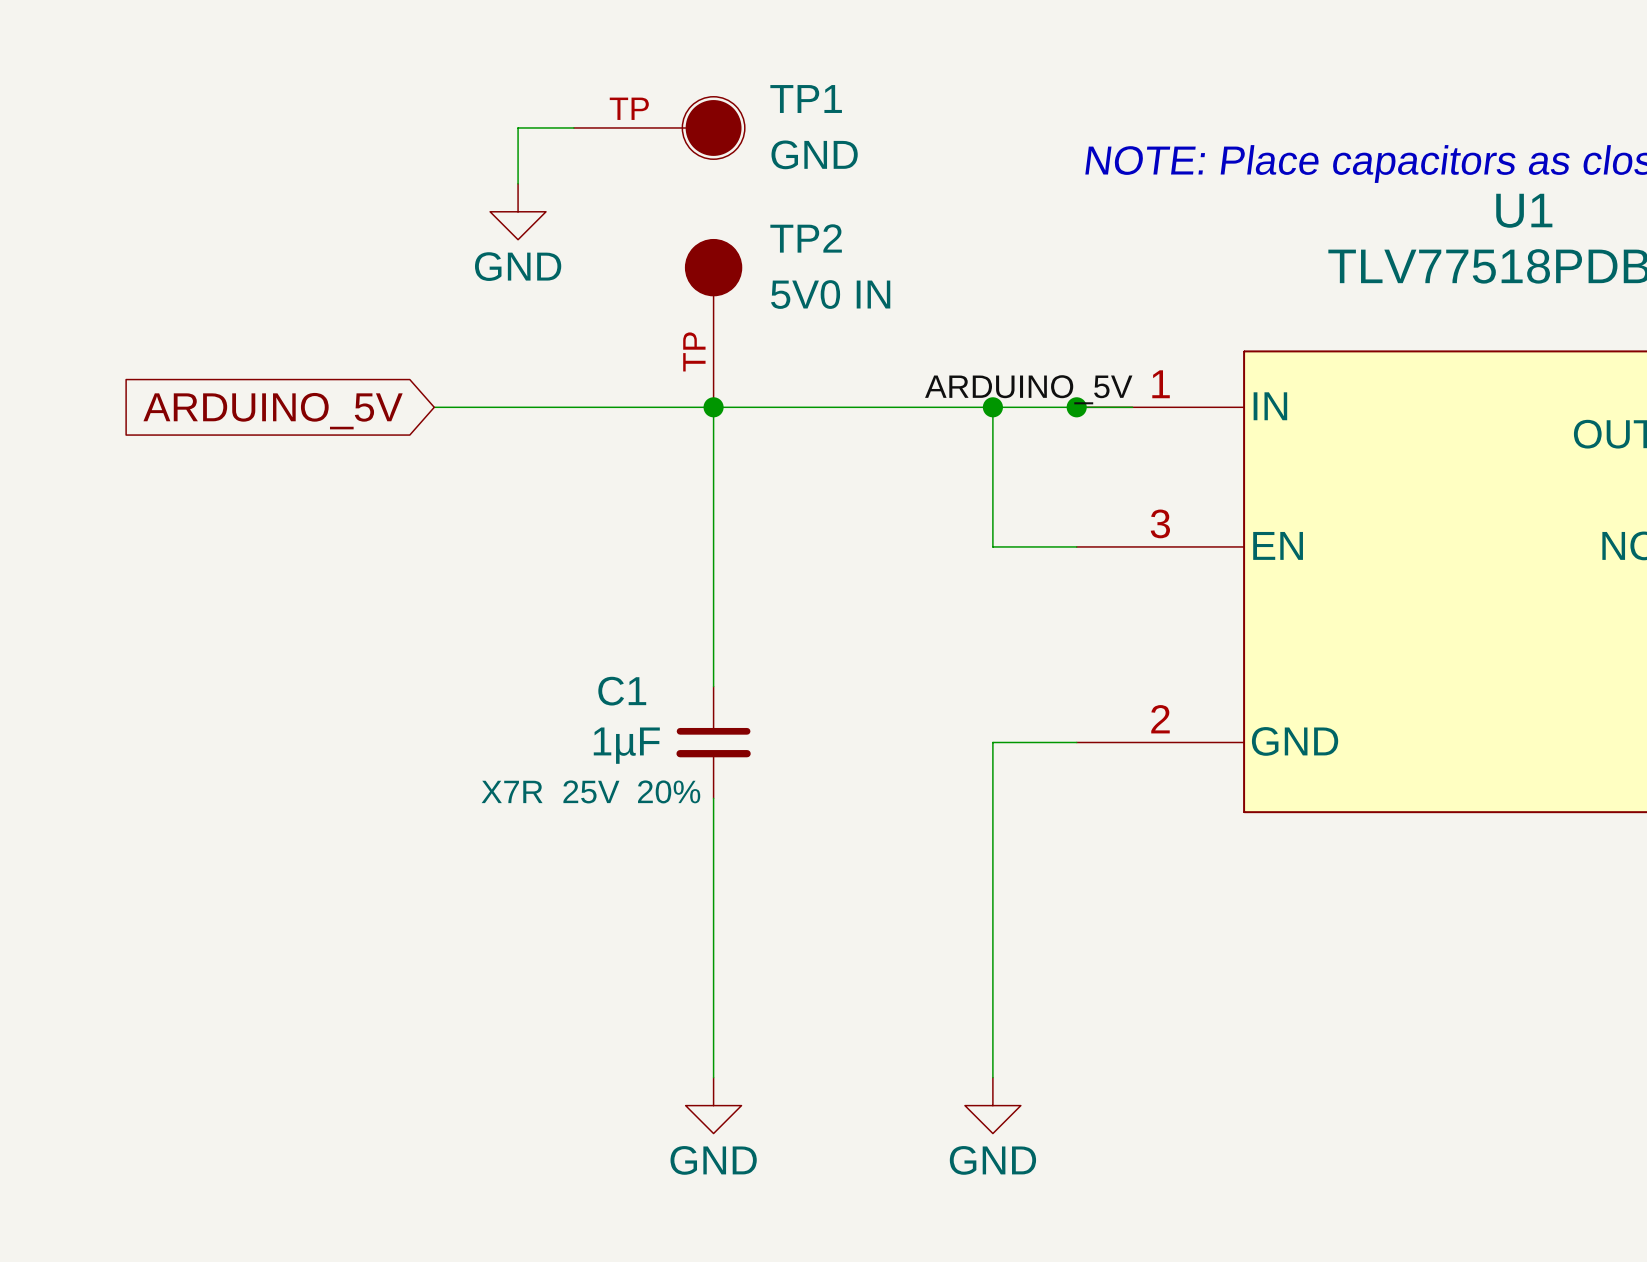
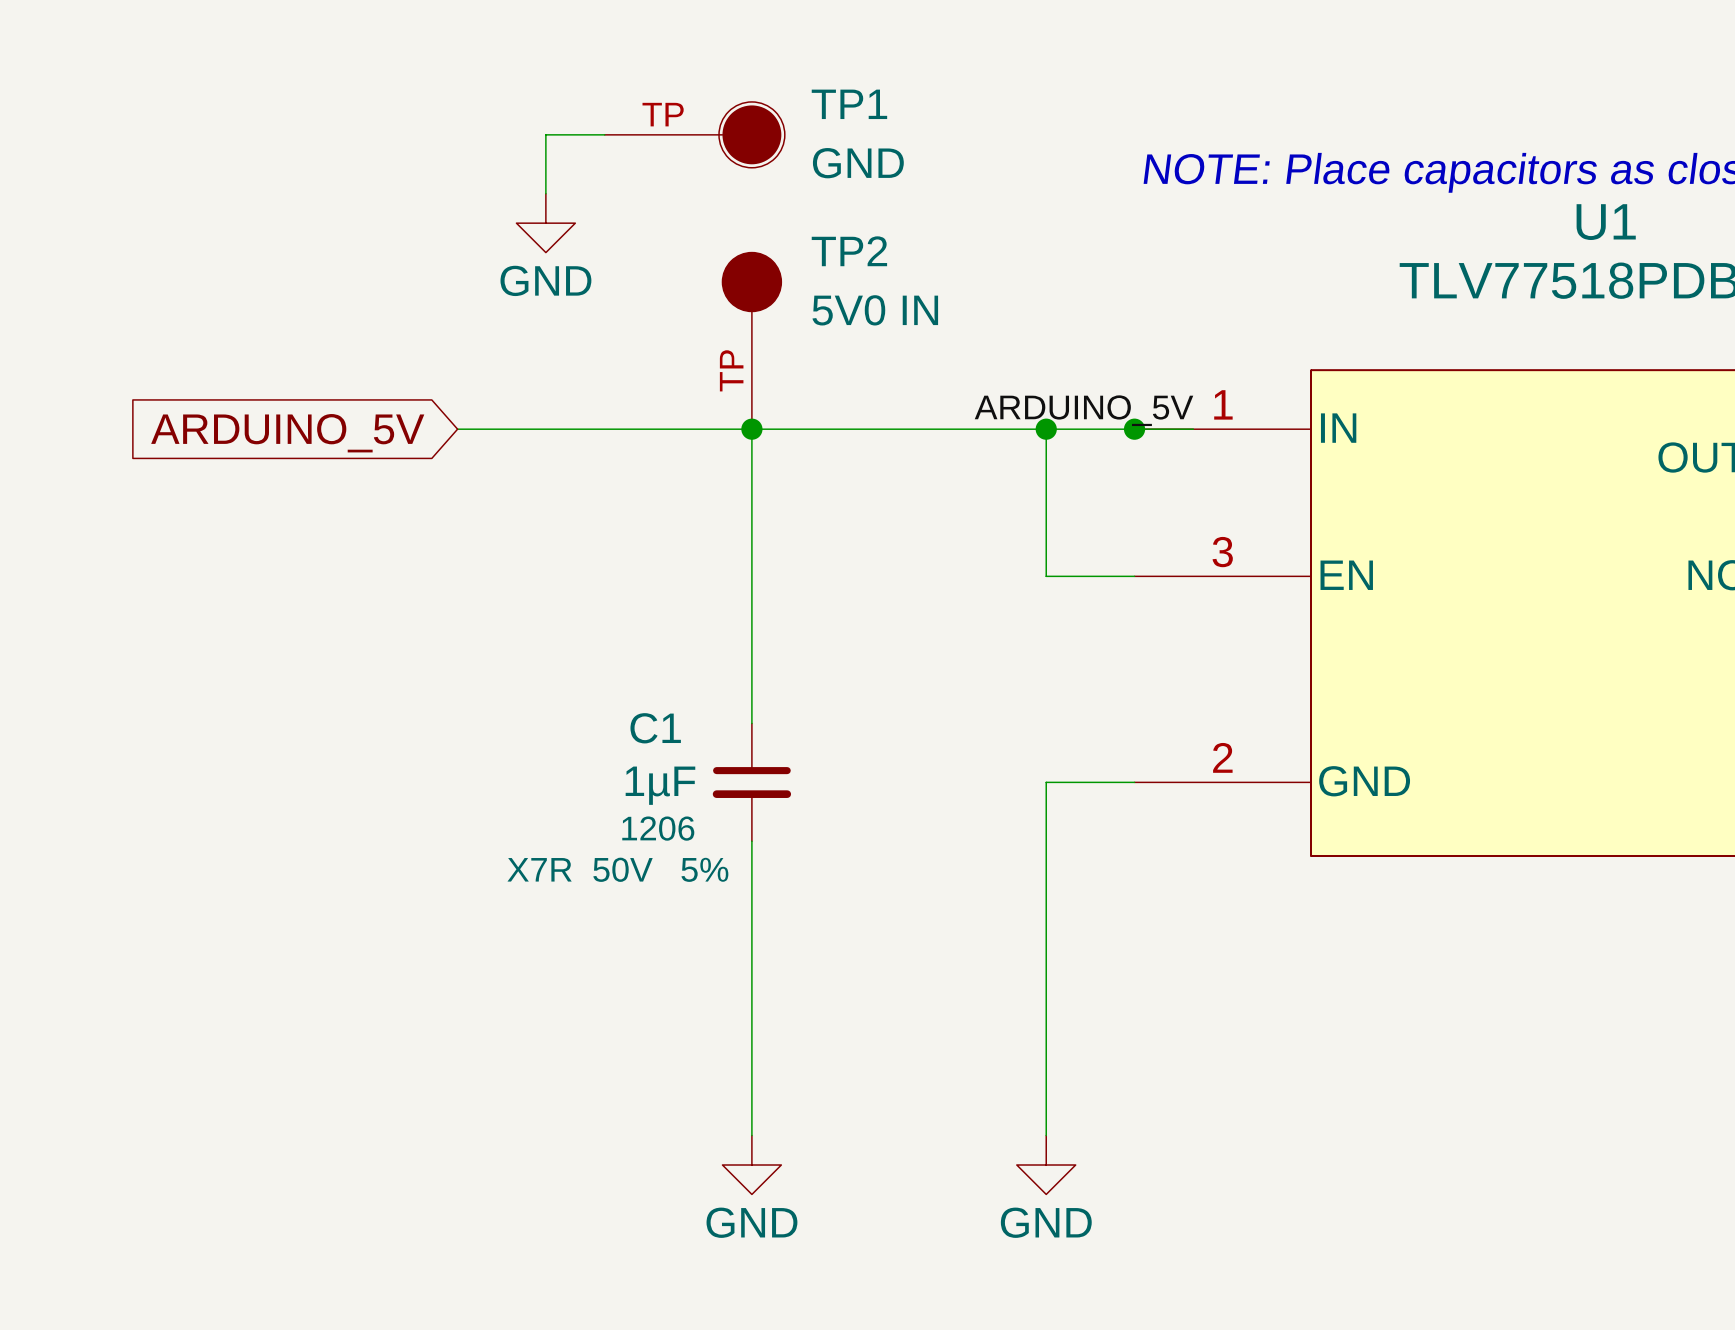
C1 text: none -> 1206 (658, 828)
C1 text position: X7R (512, 791) -> X7R (539, 869)
C1 text: 25V (591, 791) -> 50V (623, 869)
C1 text: 20% (669, 791) -> 5% (704, 869)

